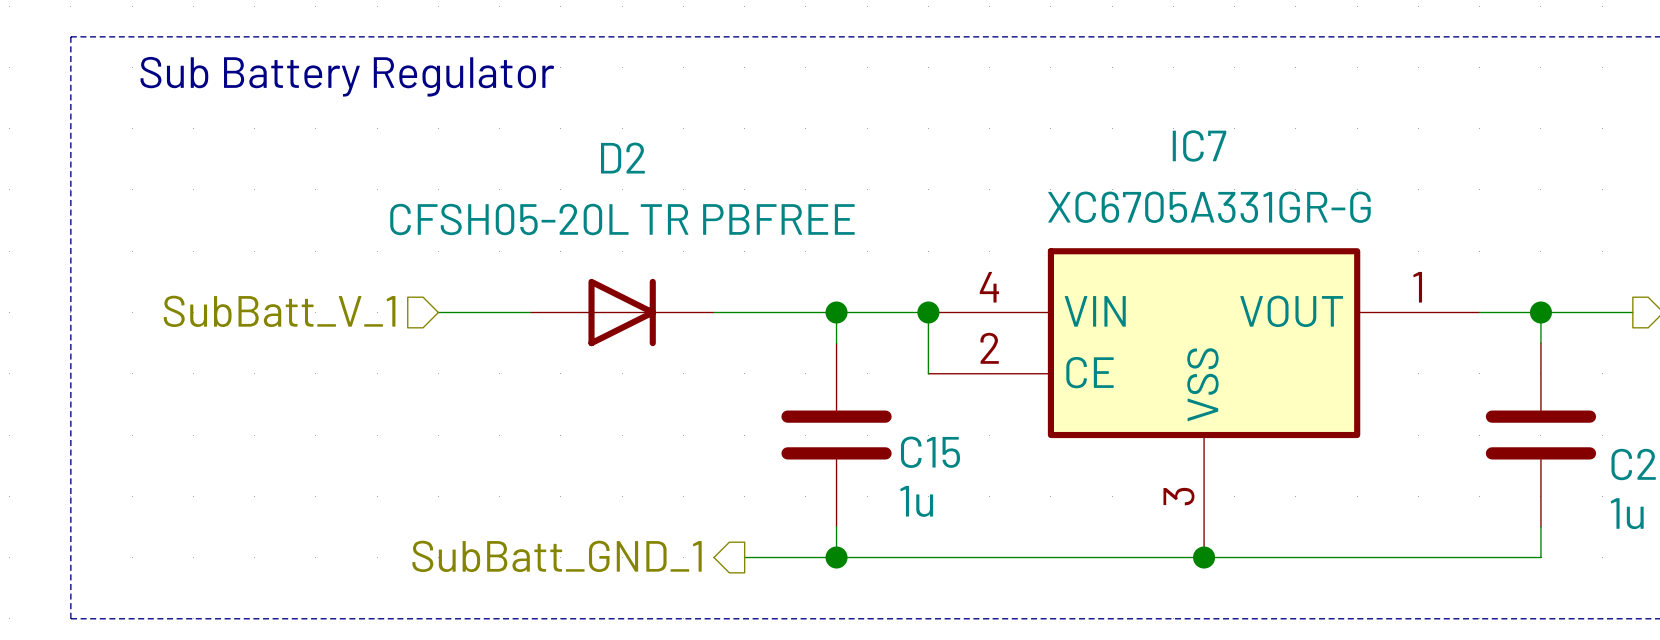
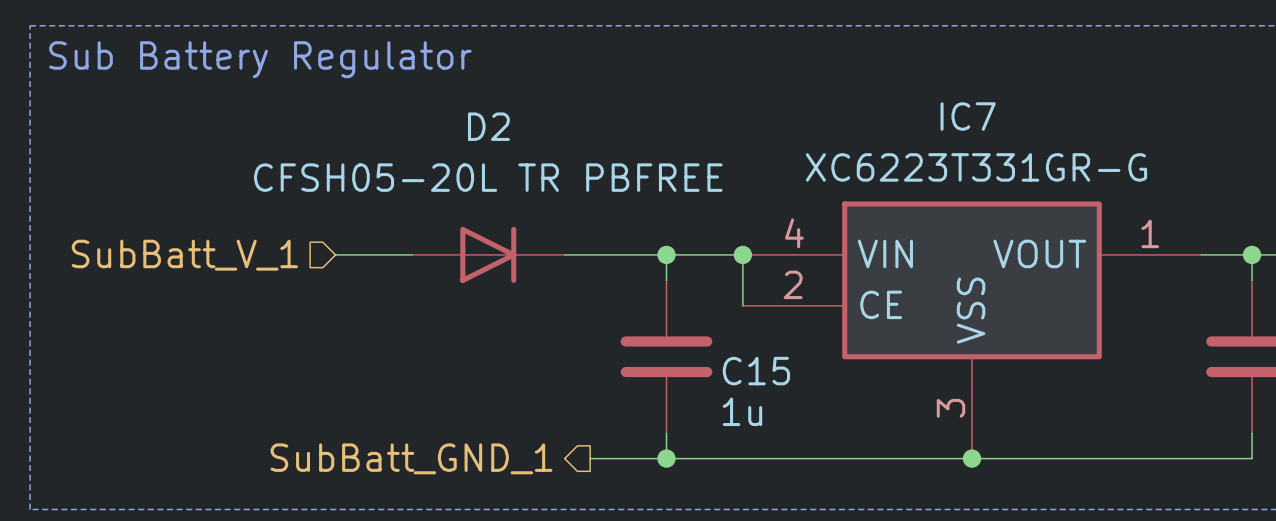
IC7 value: XC6705A331GR-G (1209, 207) -> XC6223T331GR-G (976, 167)

